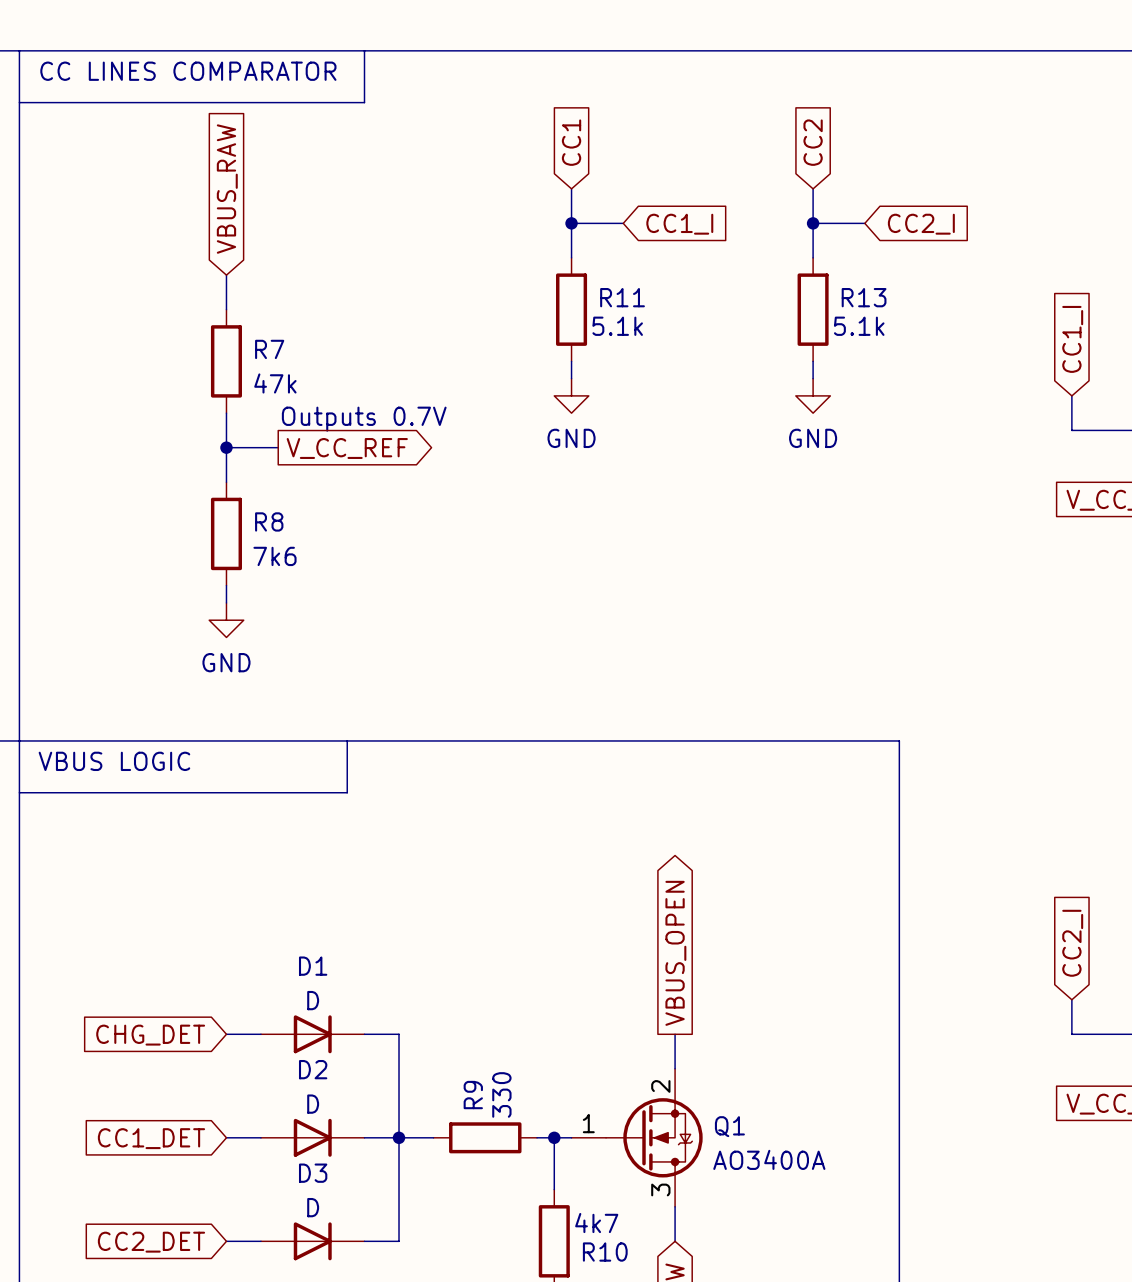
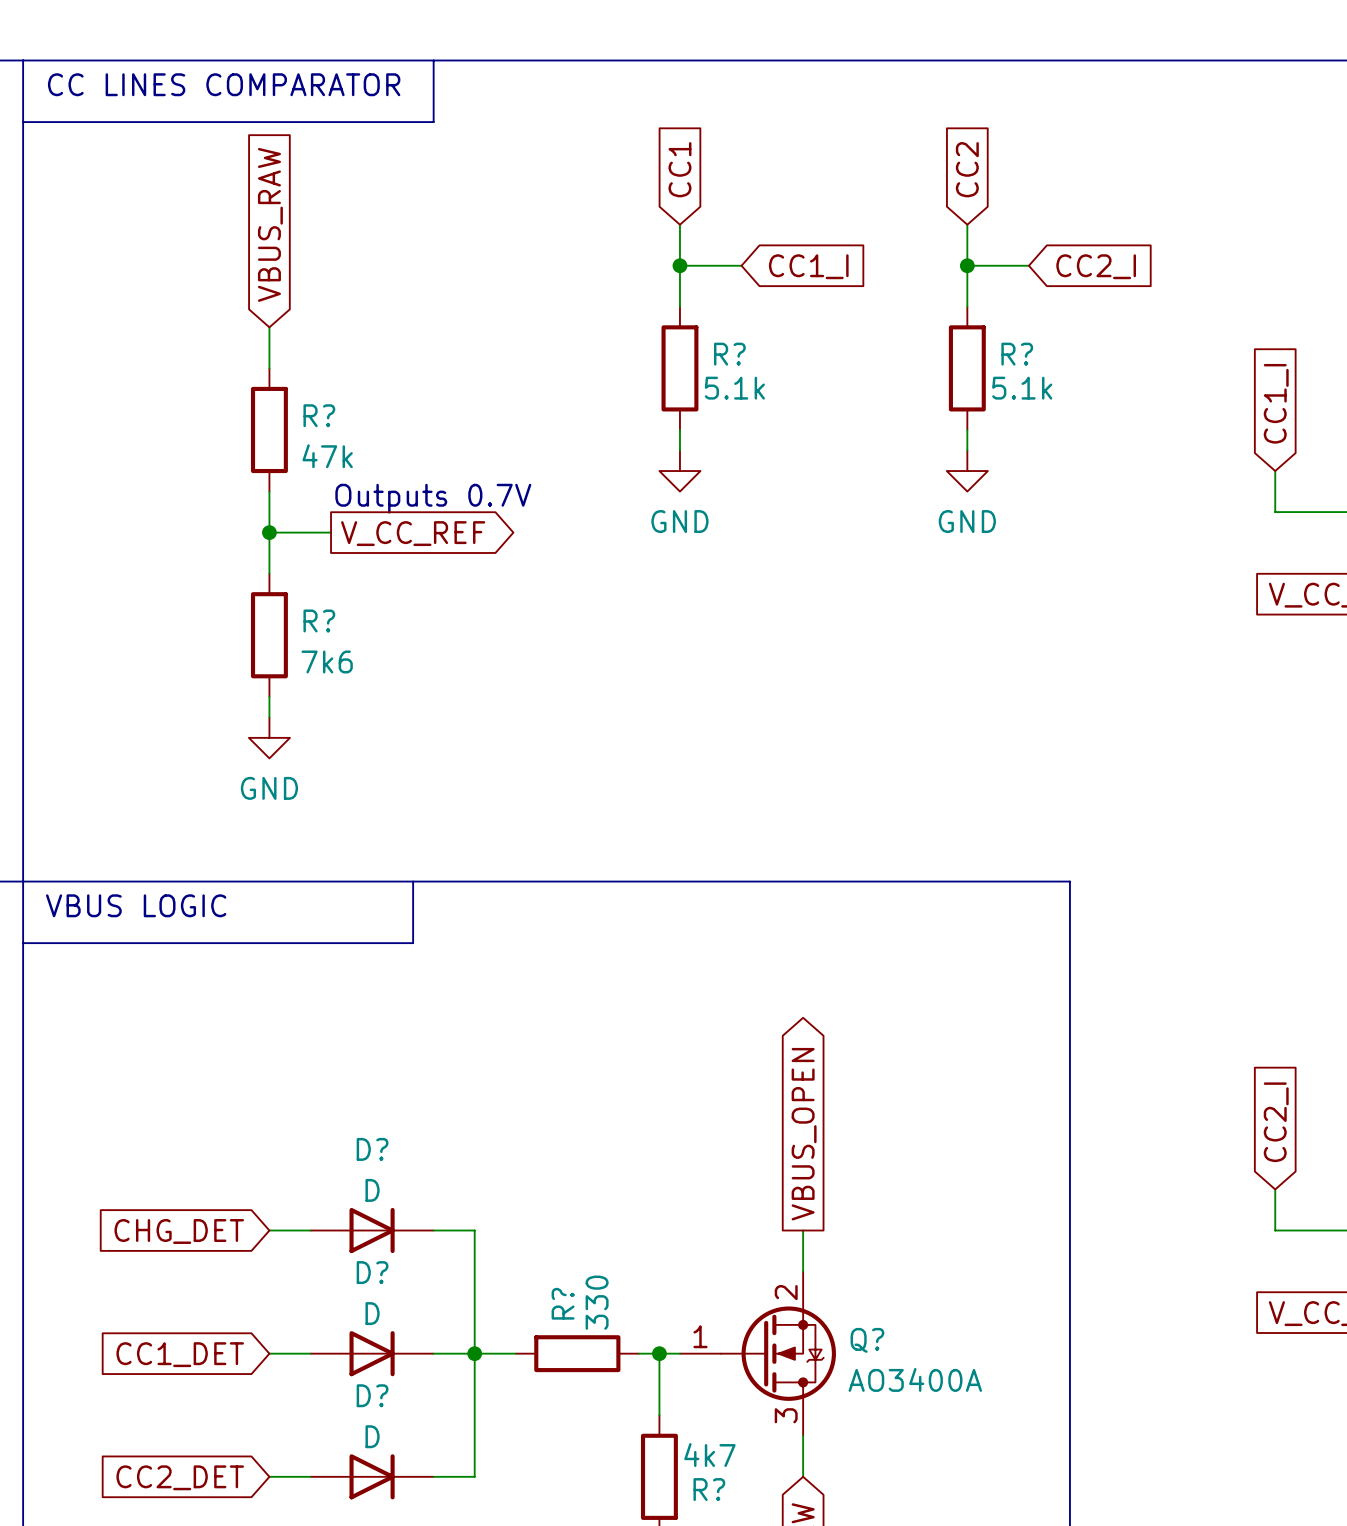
R11 name: R11 (622, 297) -> R? (729, 354)
R13 name: R13 (864, 297) -> R? (1017, 354)
R7 name: R7 (269, 349) -> R? (319, 415)
R8 name: R8 (269, 521) -> R? (319, 620)
D1 name: D1 (313, 966) -> D? (372, 1149)
D2 name: D2 (313, 1069) -> D? (372, 1272)
R9 name: R9 (473, 1095) -> R? (563, 1303)
Q1 name: Q1 (729, 1126) -> Q? (867, 1340)
D3 name: D3 (313, 1173) -> D? (372, 1395)
R10 name: R10 (605, 1252) -> R? (709, 1489)

